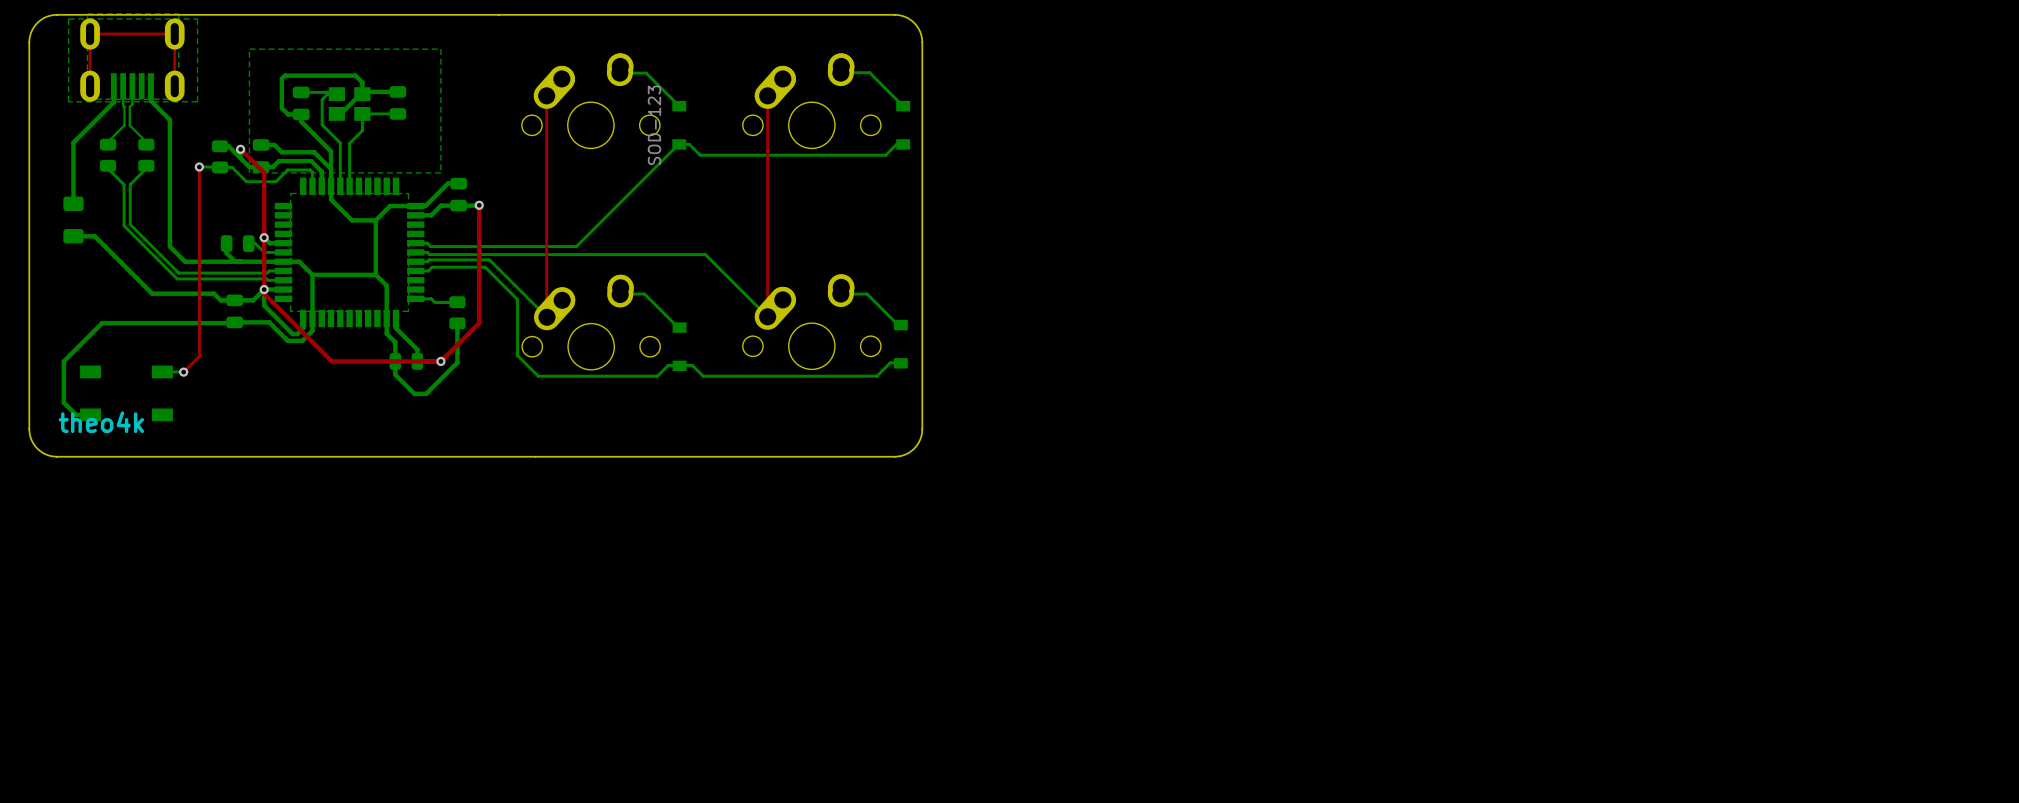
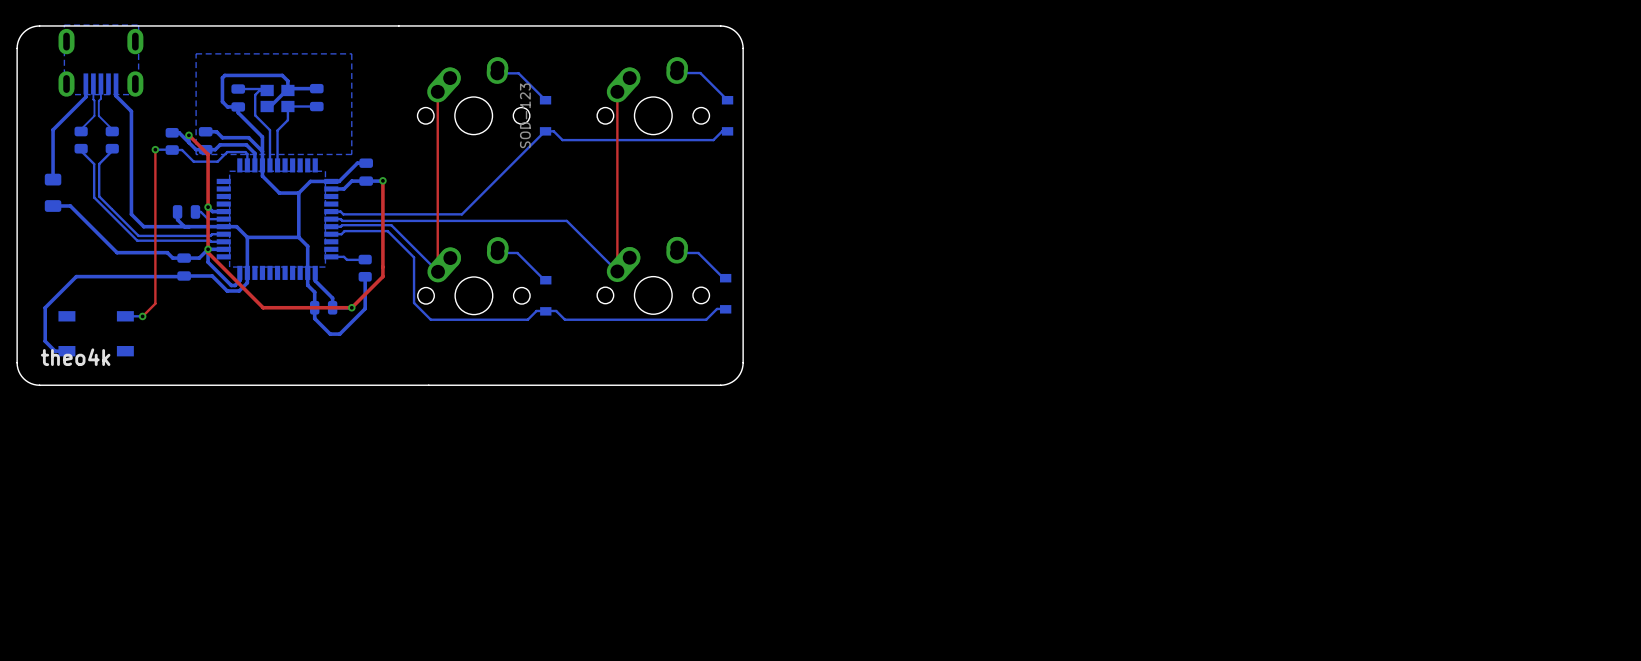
bottom zone outline: (68, 18) (68, 101) (197, 101) (197, 18) (68, 18) -> none
top track: (90, 86) (90, 34) (174, 34) (174, 86) -> none

